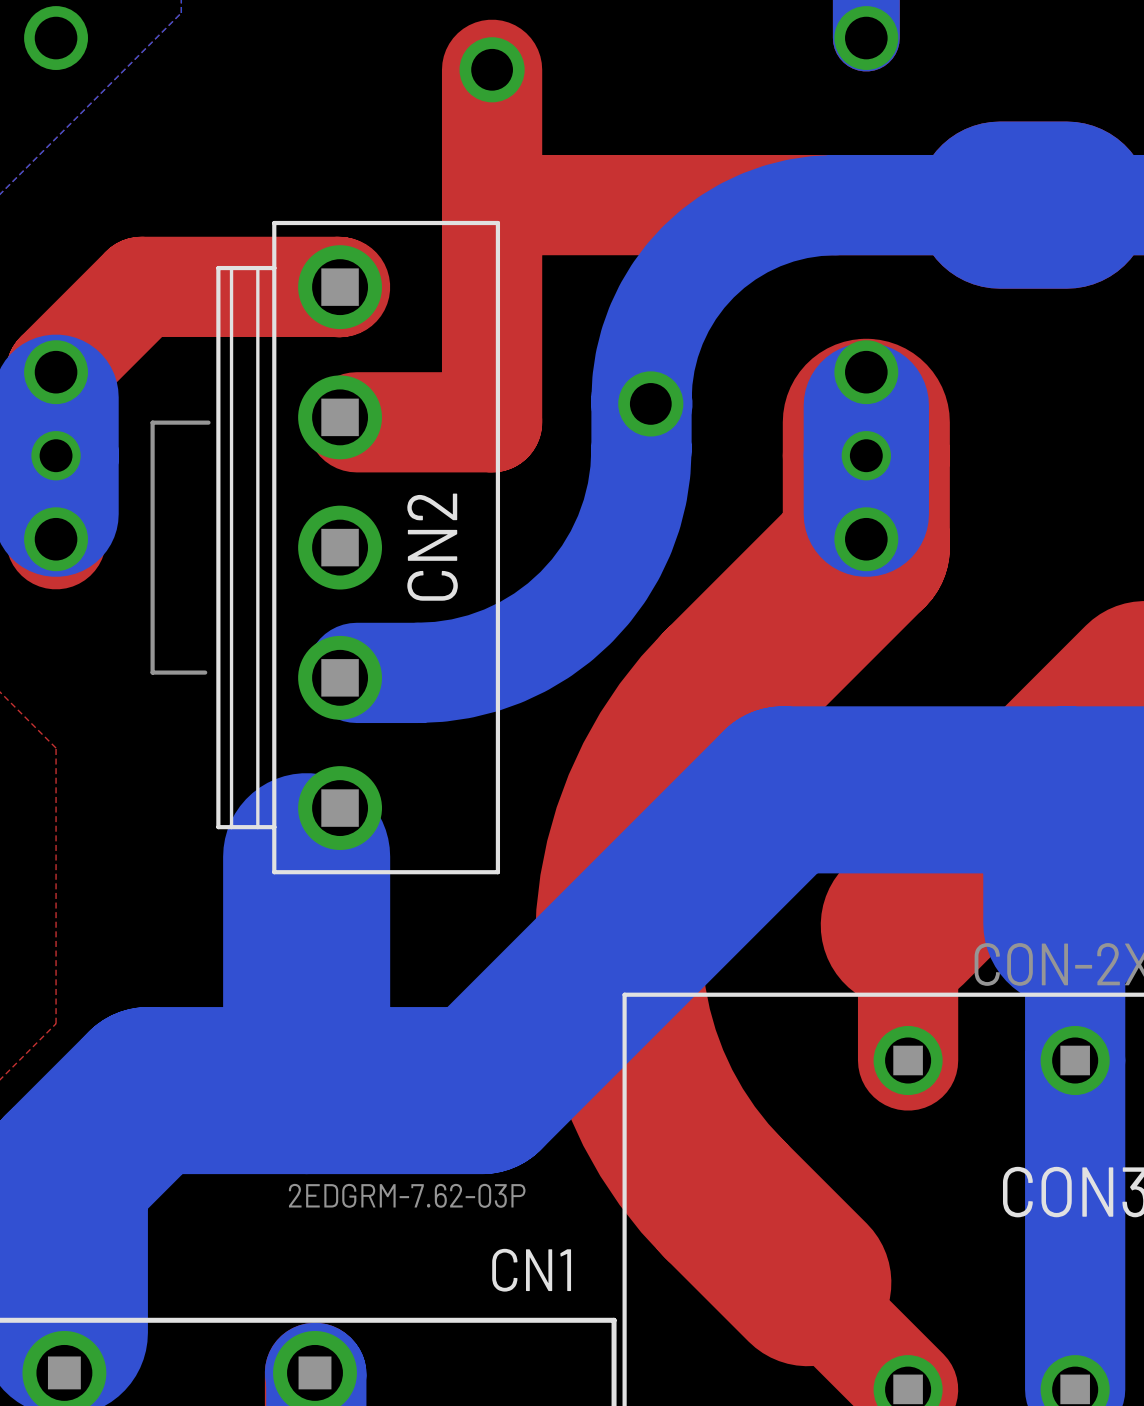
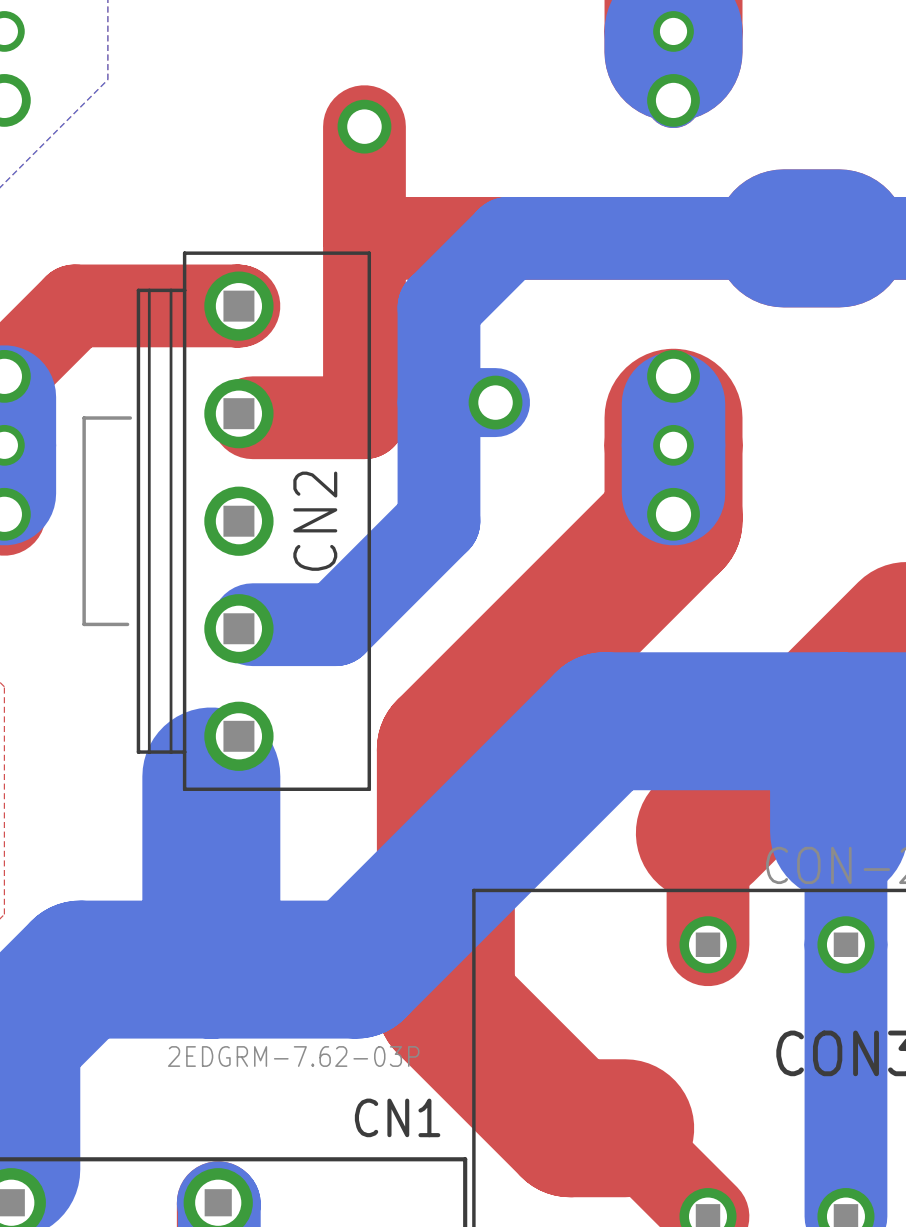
bottom track: (835, 205) (797, 208) (779, 213) (744, 228) (727, 237) (698, 261) (674, 291) (656, 324) (645, 361) (641, 399) (640, 471) (631, 514) (615, 554) (590, 591) (559, 622) (542, 635) (503, 655) (461, 668) (417, 672) -> (648, 238) (507, 238) (438, 307) (438, 521) (335, 624) (303, 624)
top track: (723, 689) (704, 710) (671, 756) (645, 806) (636, 833) (622, 888) (619, 916) (618, 944) (622, 1000) (636, 1055) (645, 1082) (671, 1132) (704, 1178) (807, 1282) -> (555, 638) (445, 748) (445, 1004) (570, 1128) (625, 1128)

